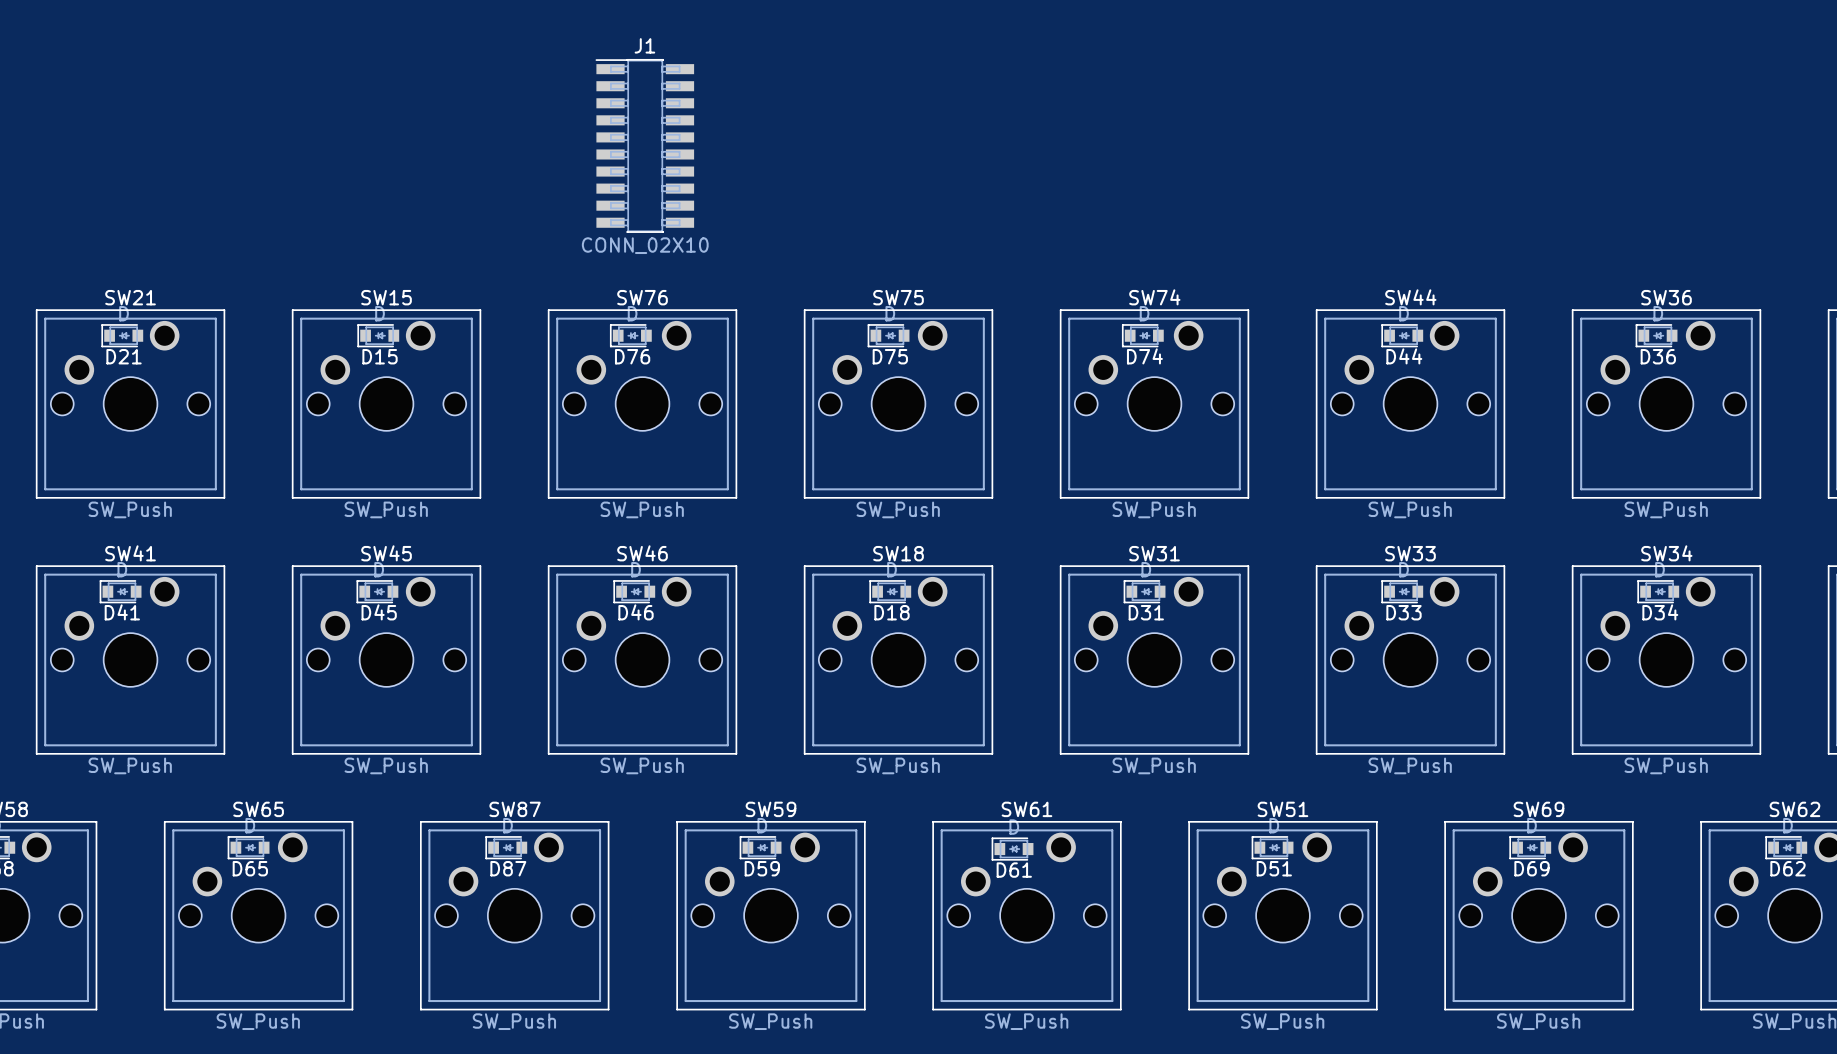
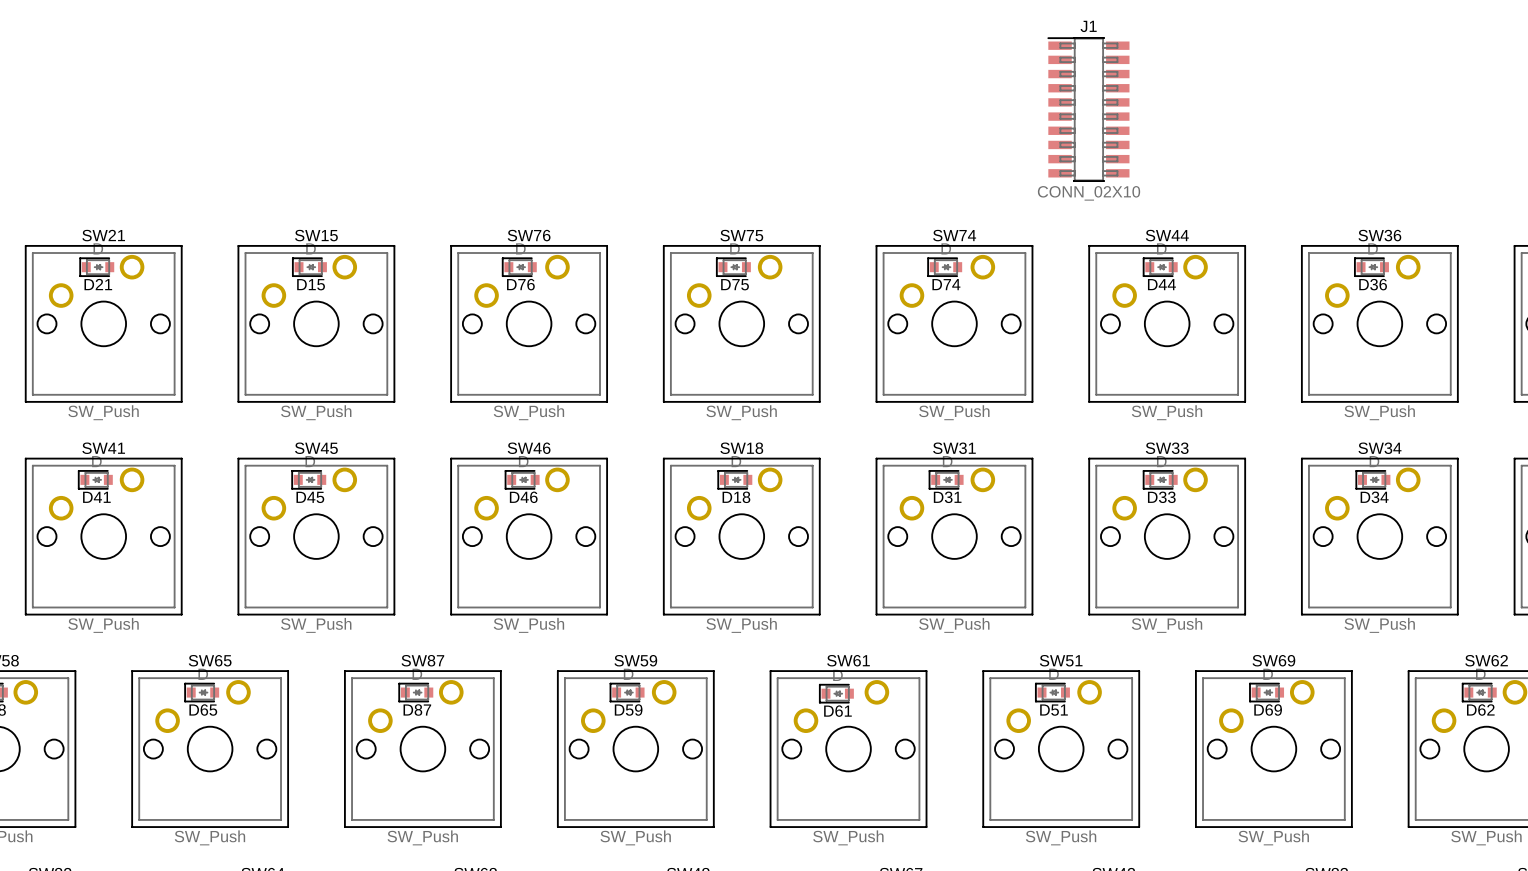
J1 position: (644, 145) -> (1088, 109)

